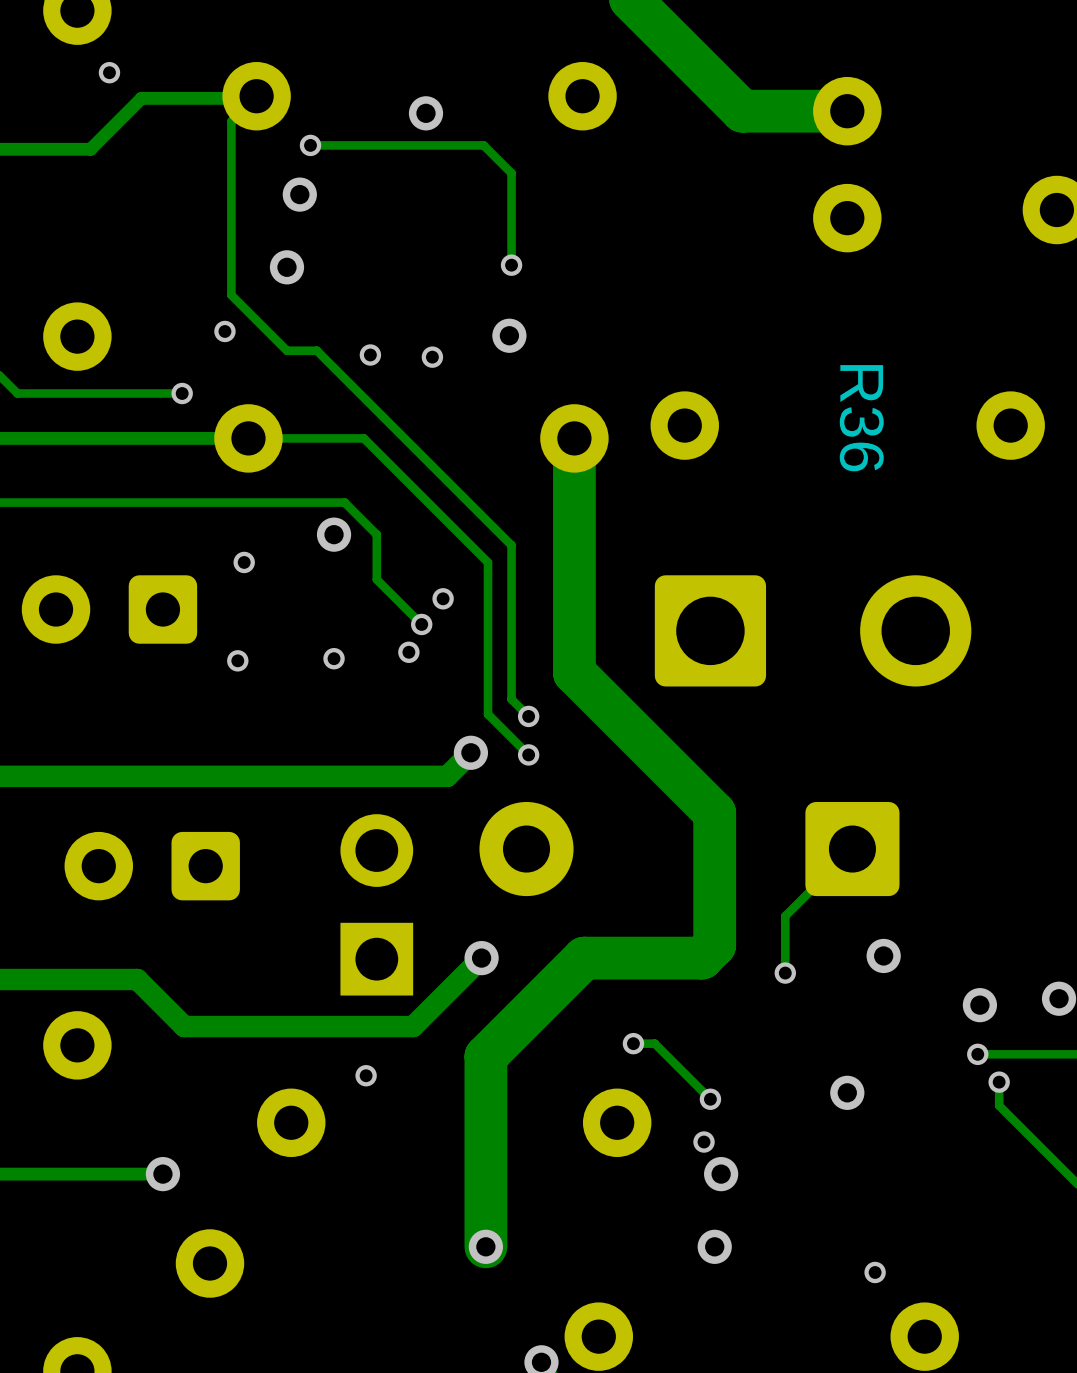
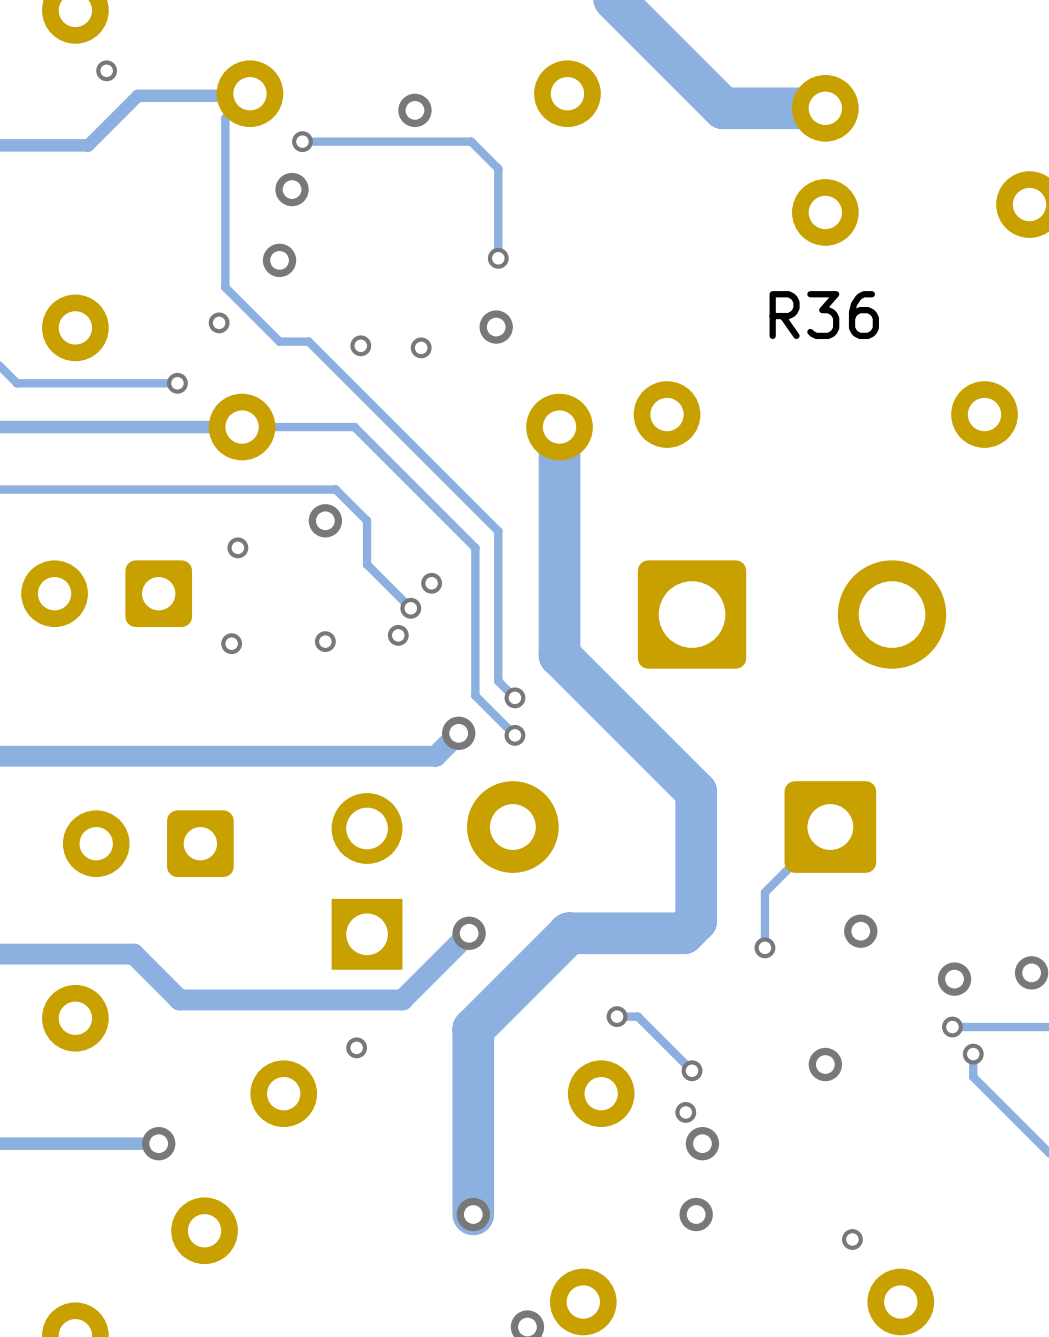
R36 name rotation: 0° (861, 418) -> 90° counterclockwise (824, 315)

